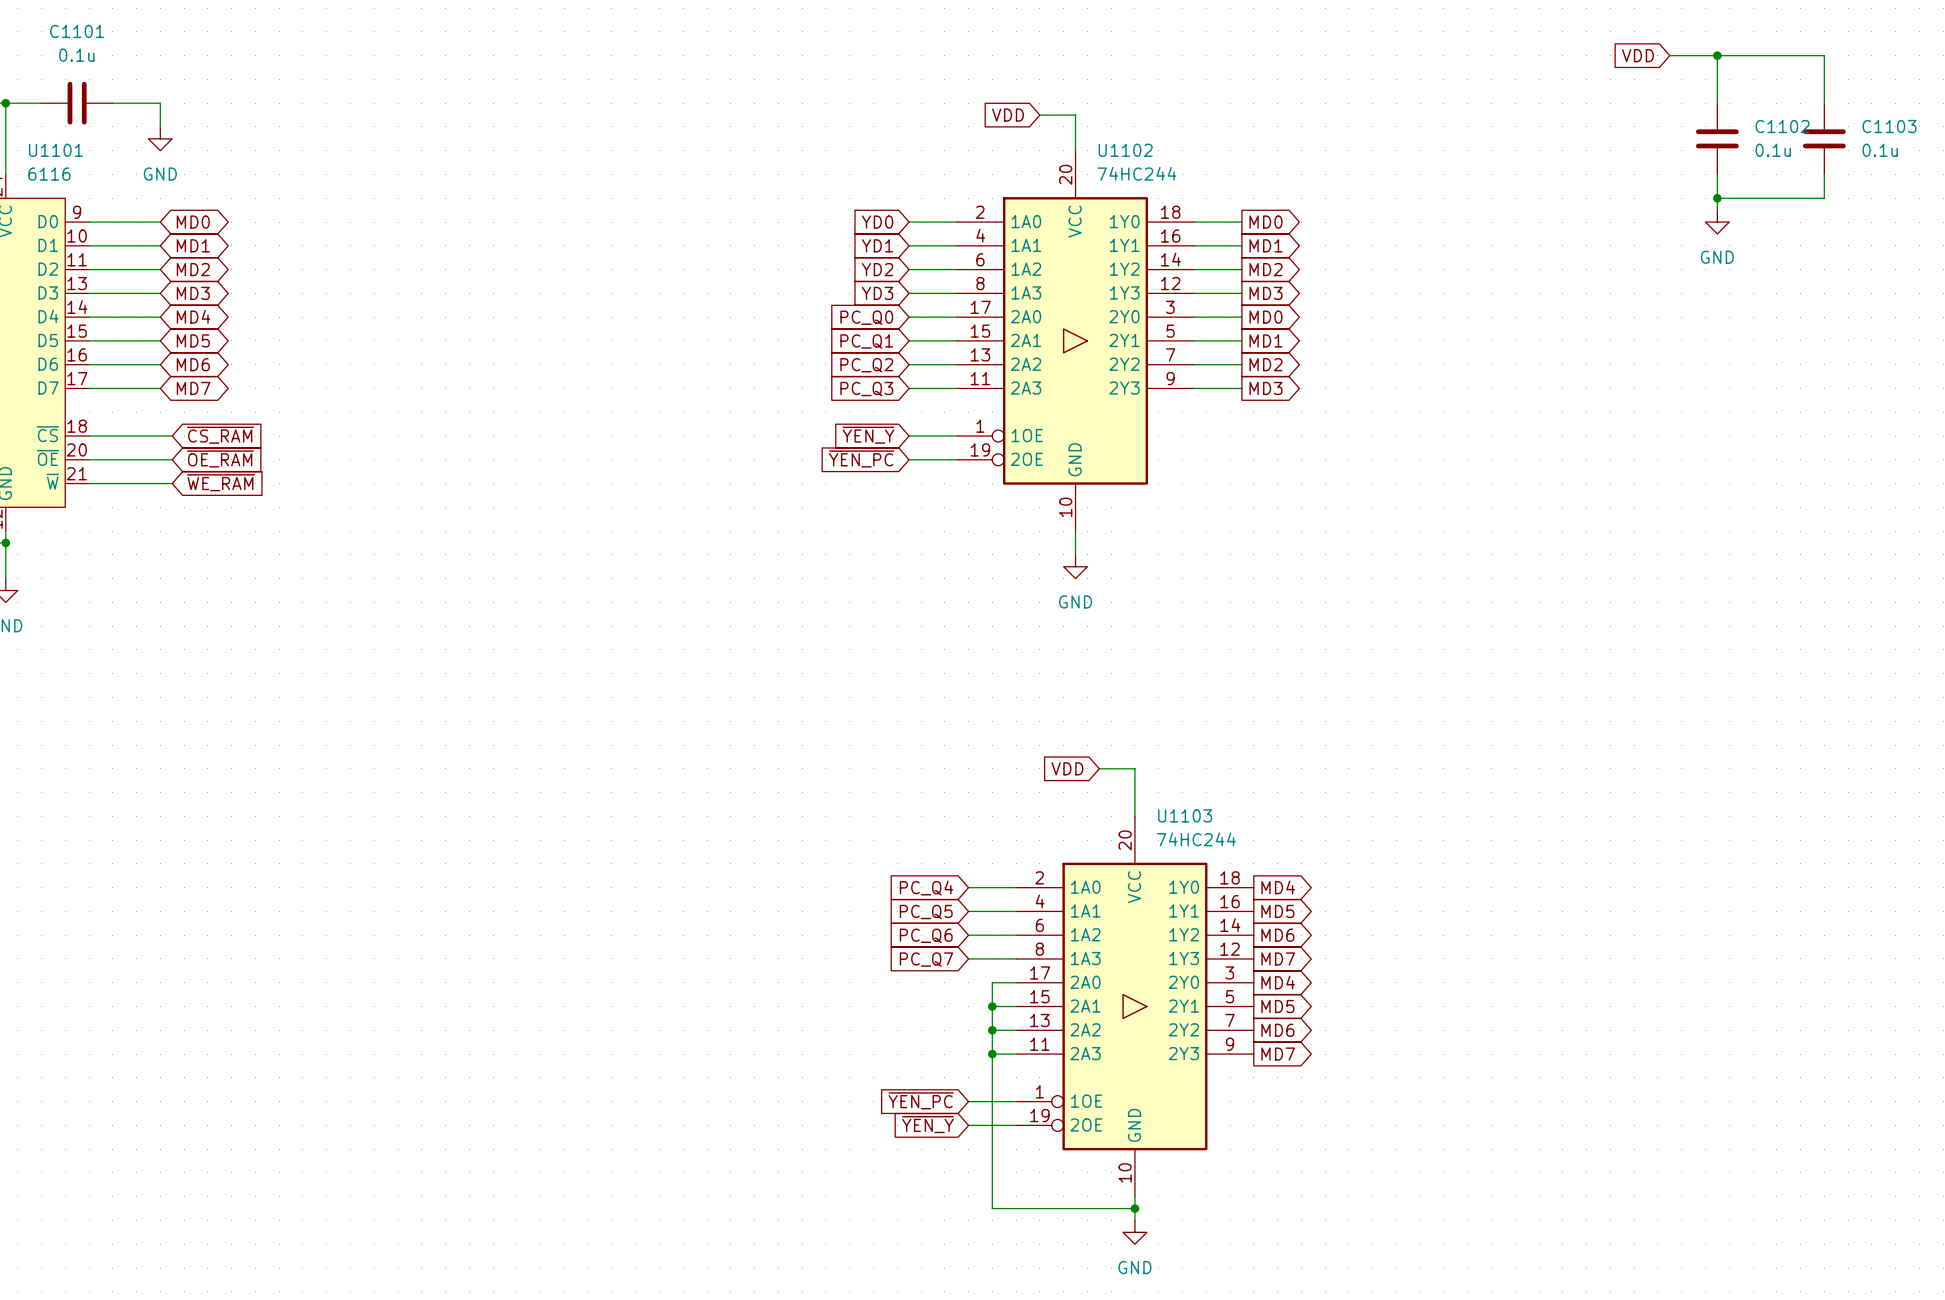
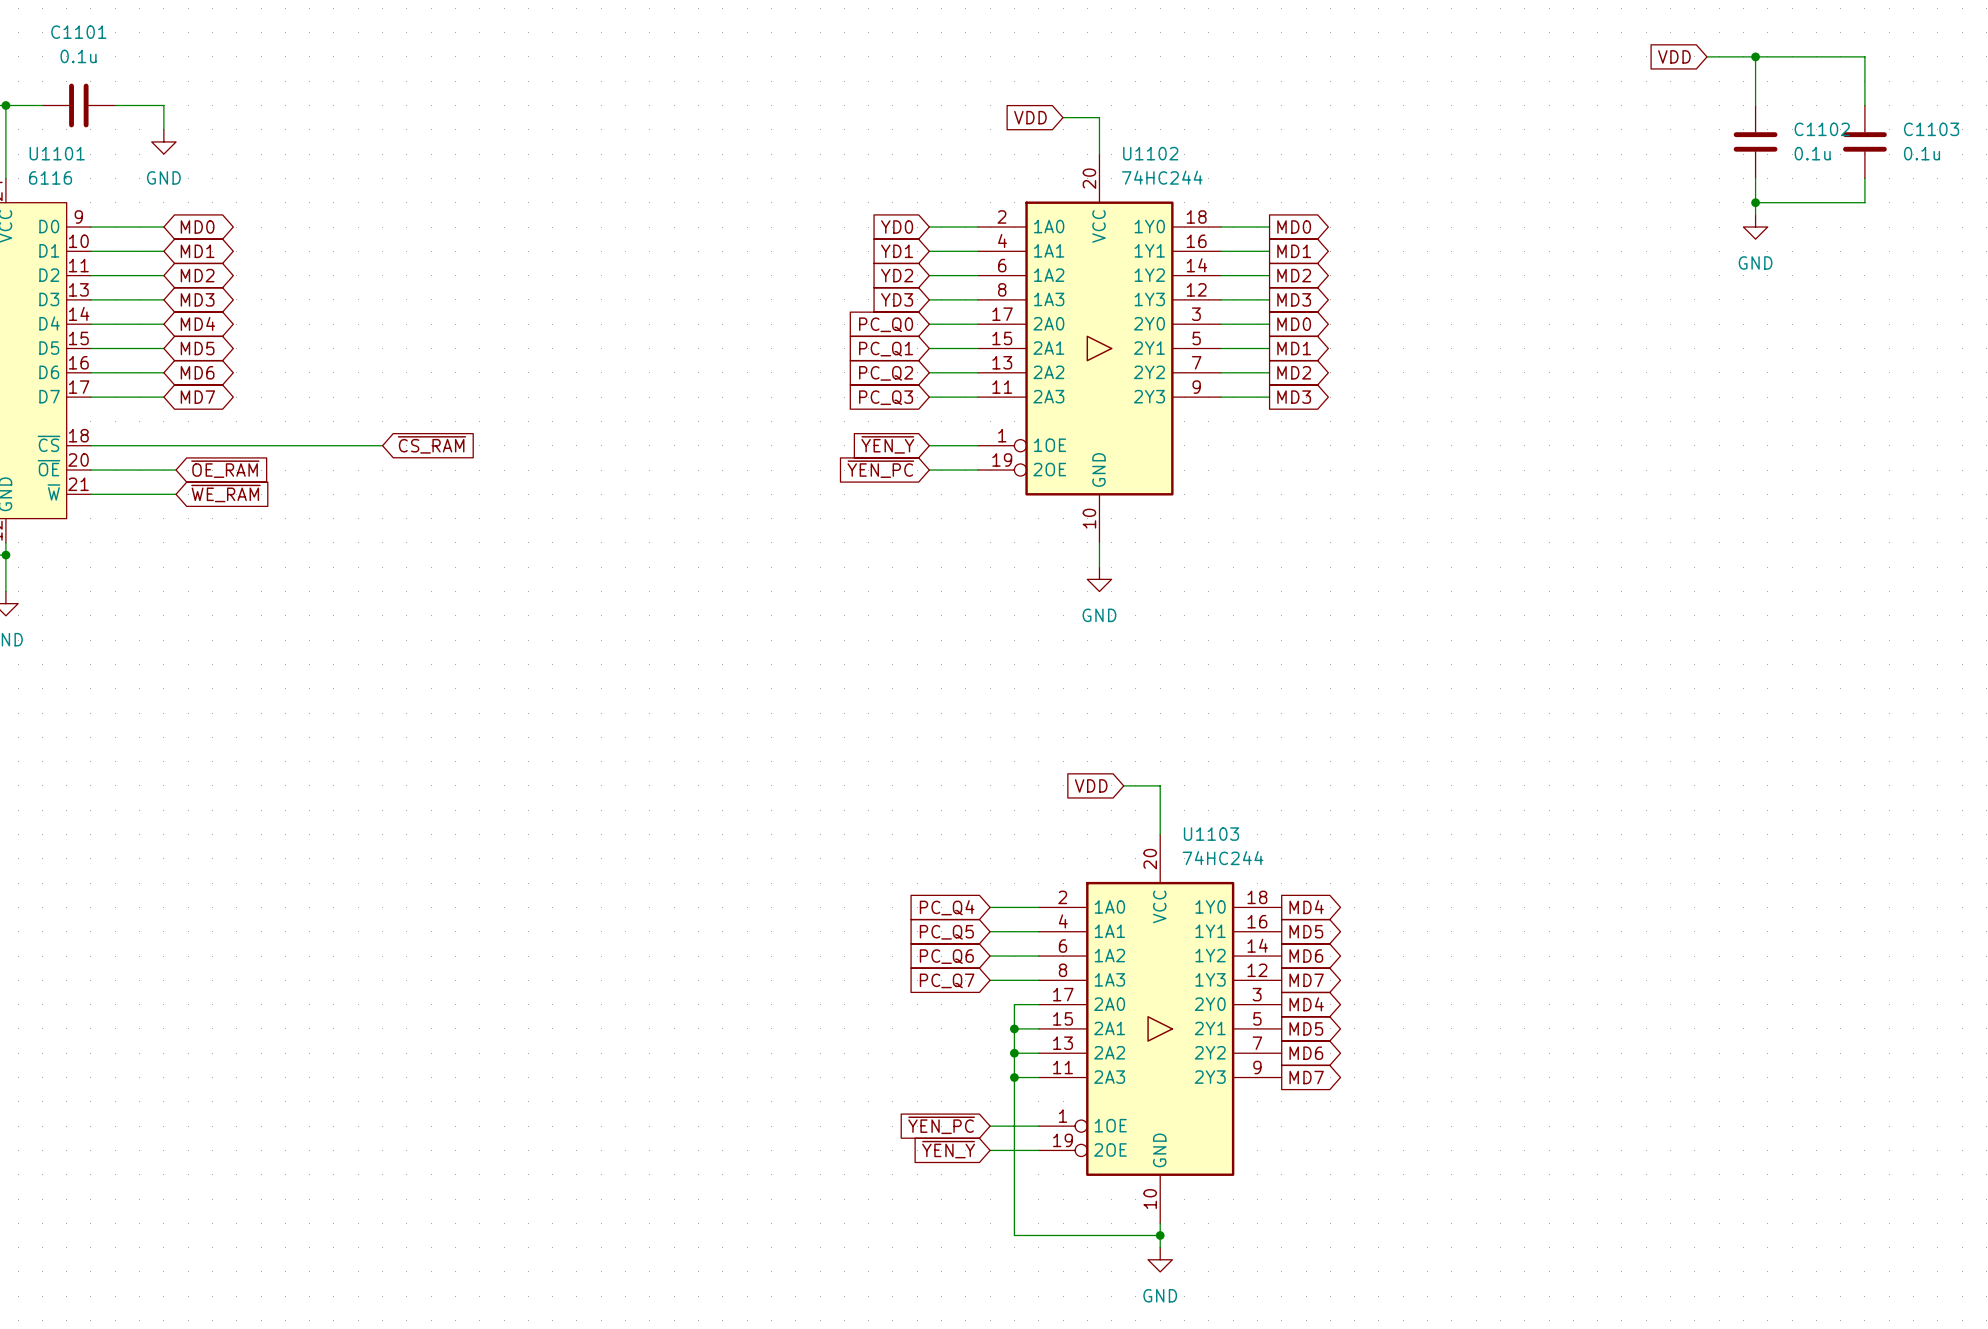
global label position: ~{CS_RAM} (220, 435) -> ~{CS_RAM} (431, 444)
wire: none -> (176, 445) (382, 445)

